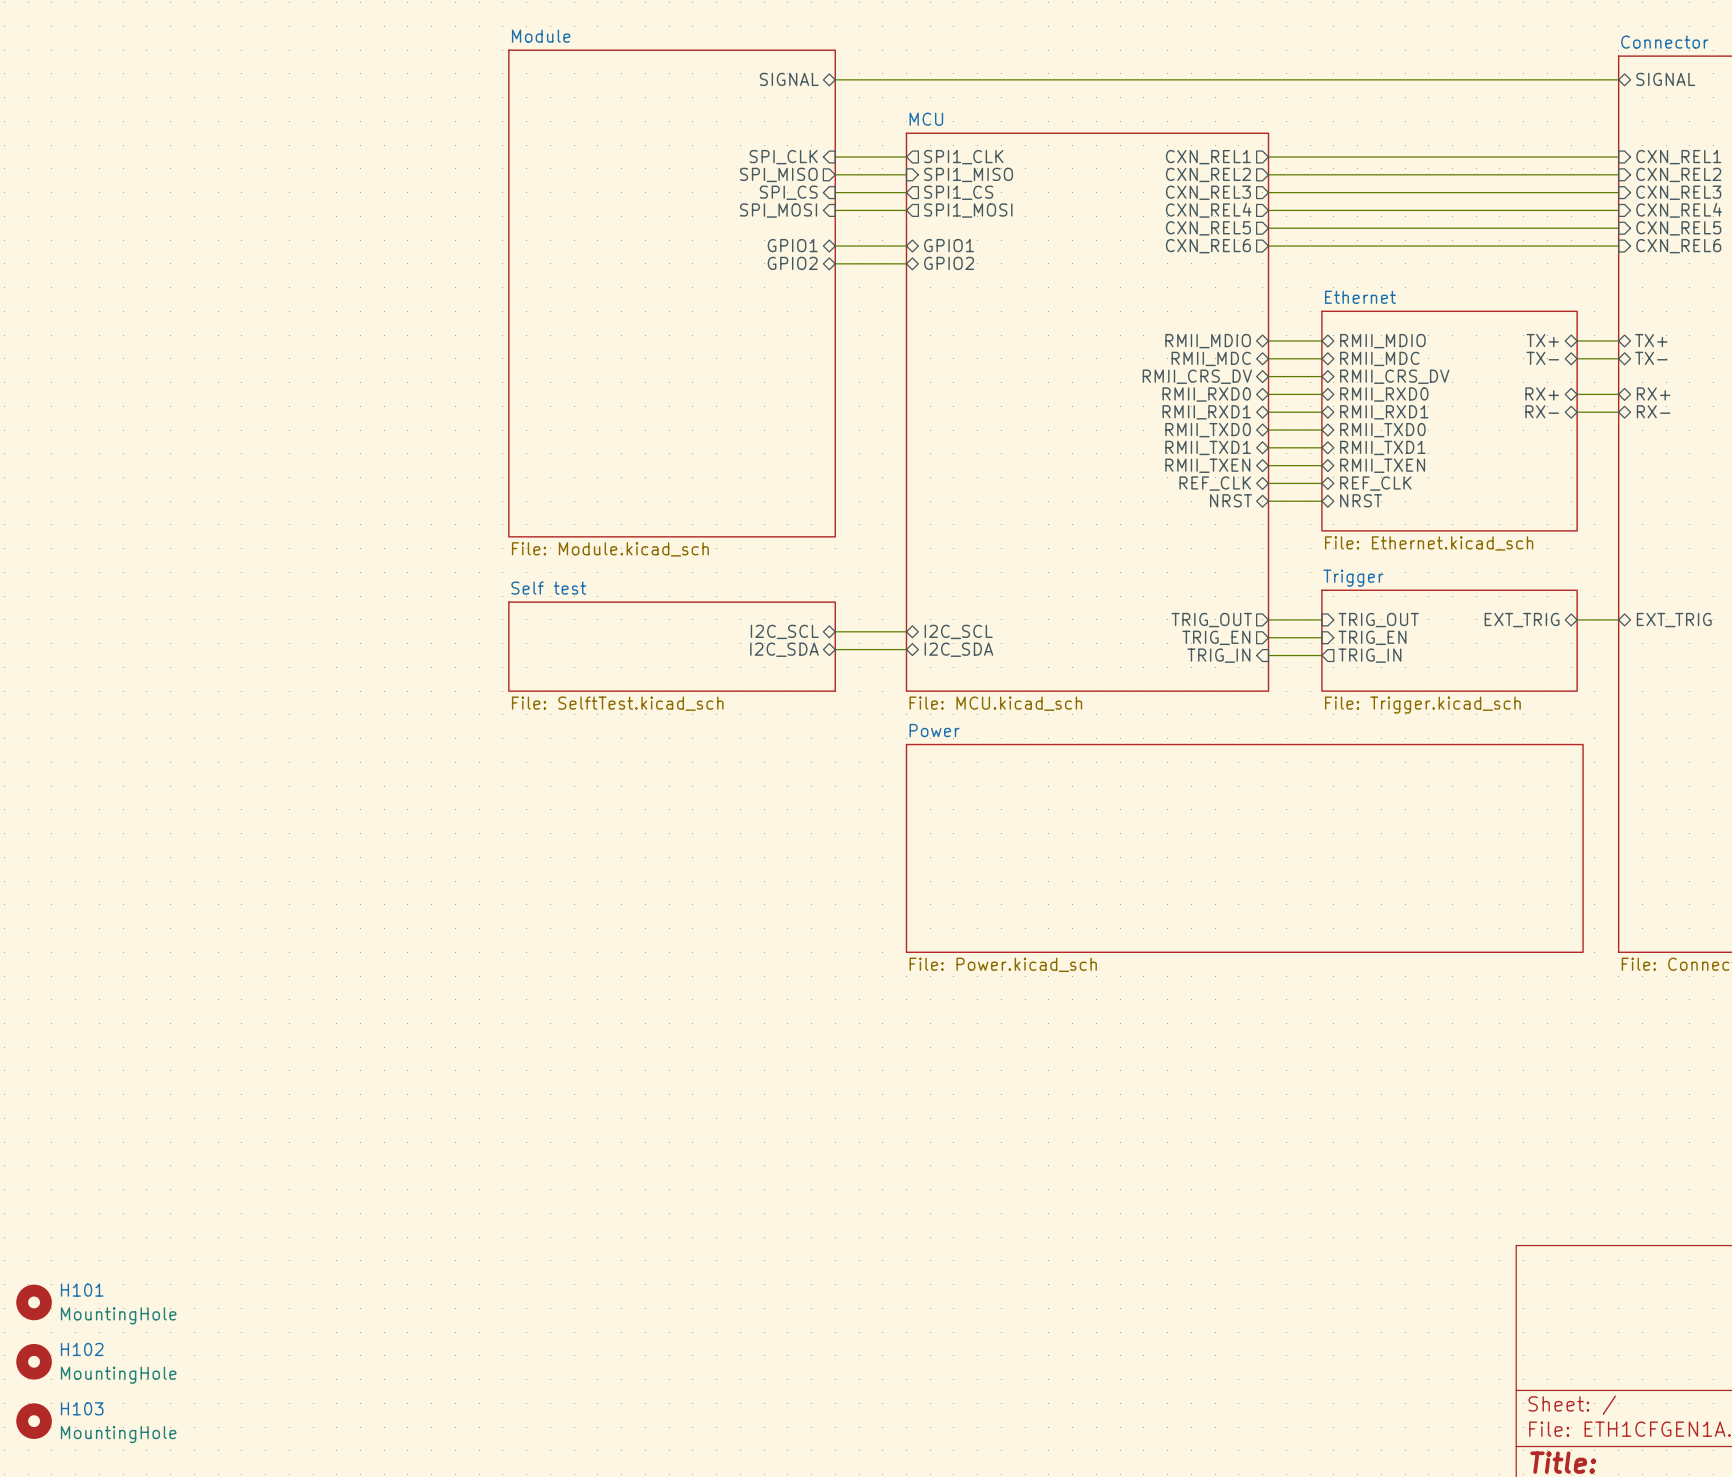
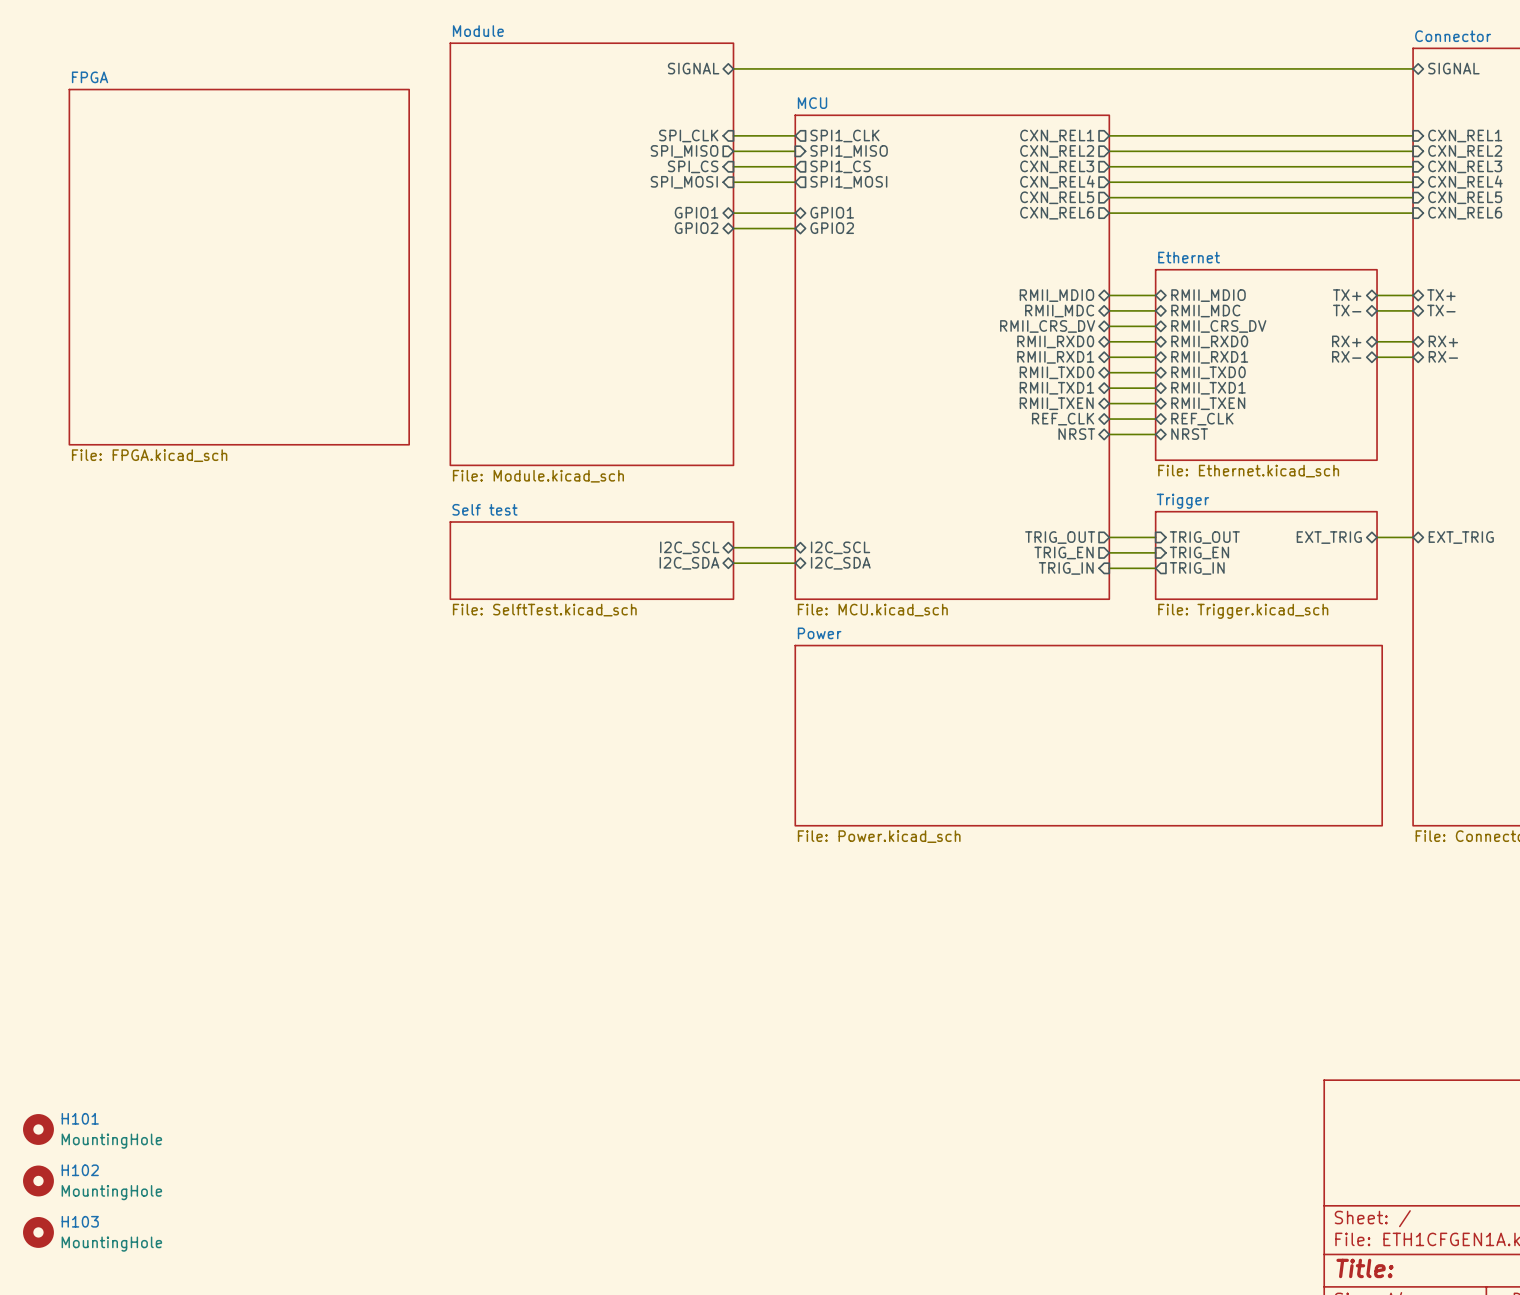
sheet FPGA: none -> File: FPGA.kicad_sch (239, 267)

